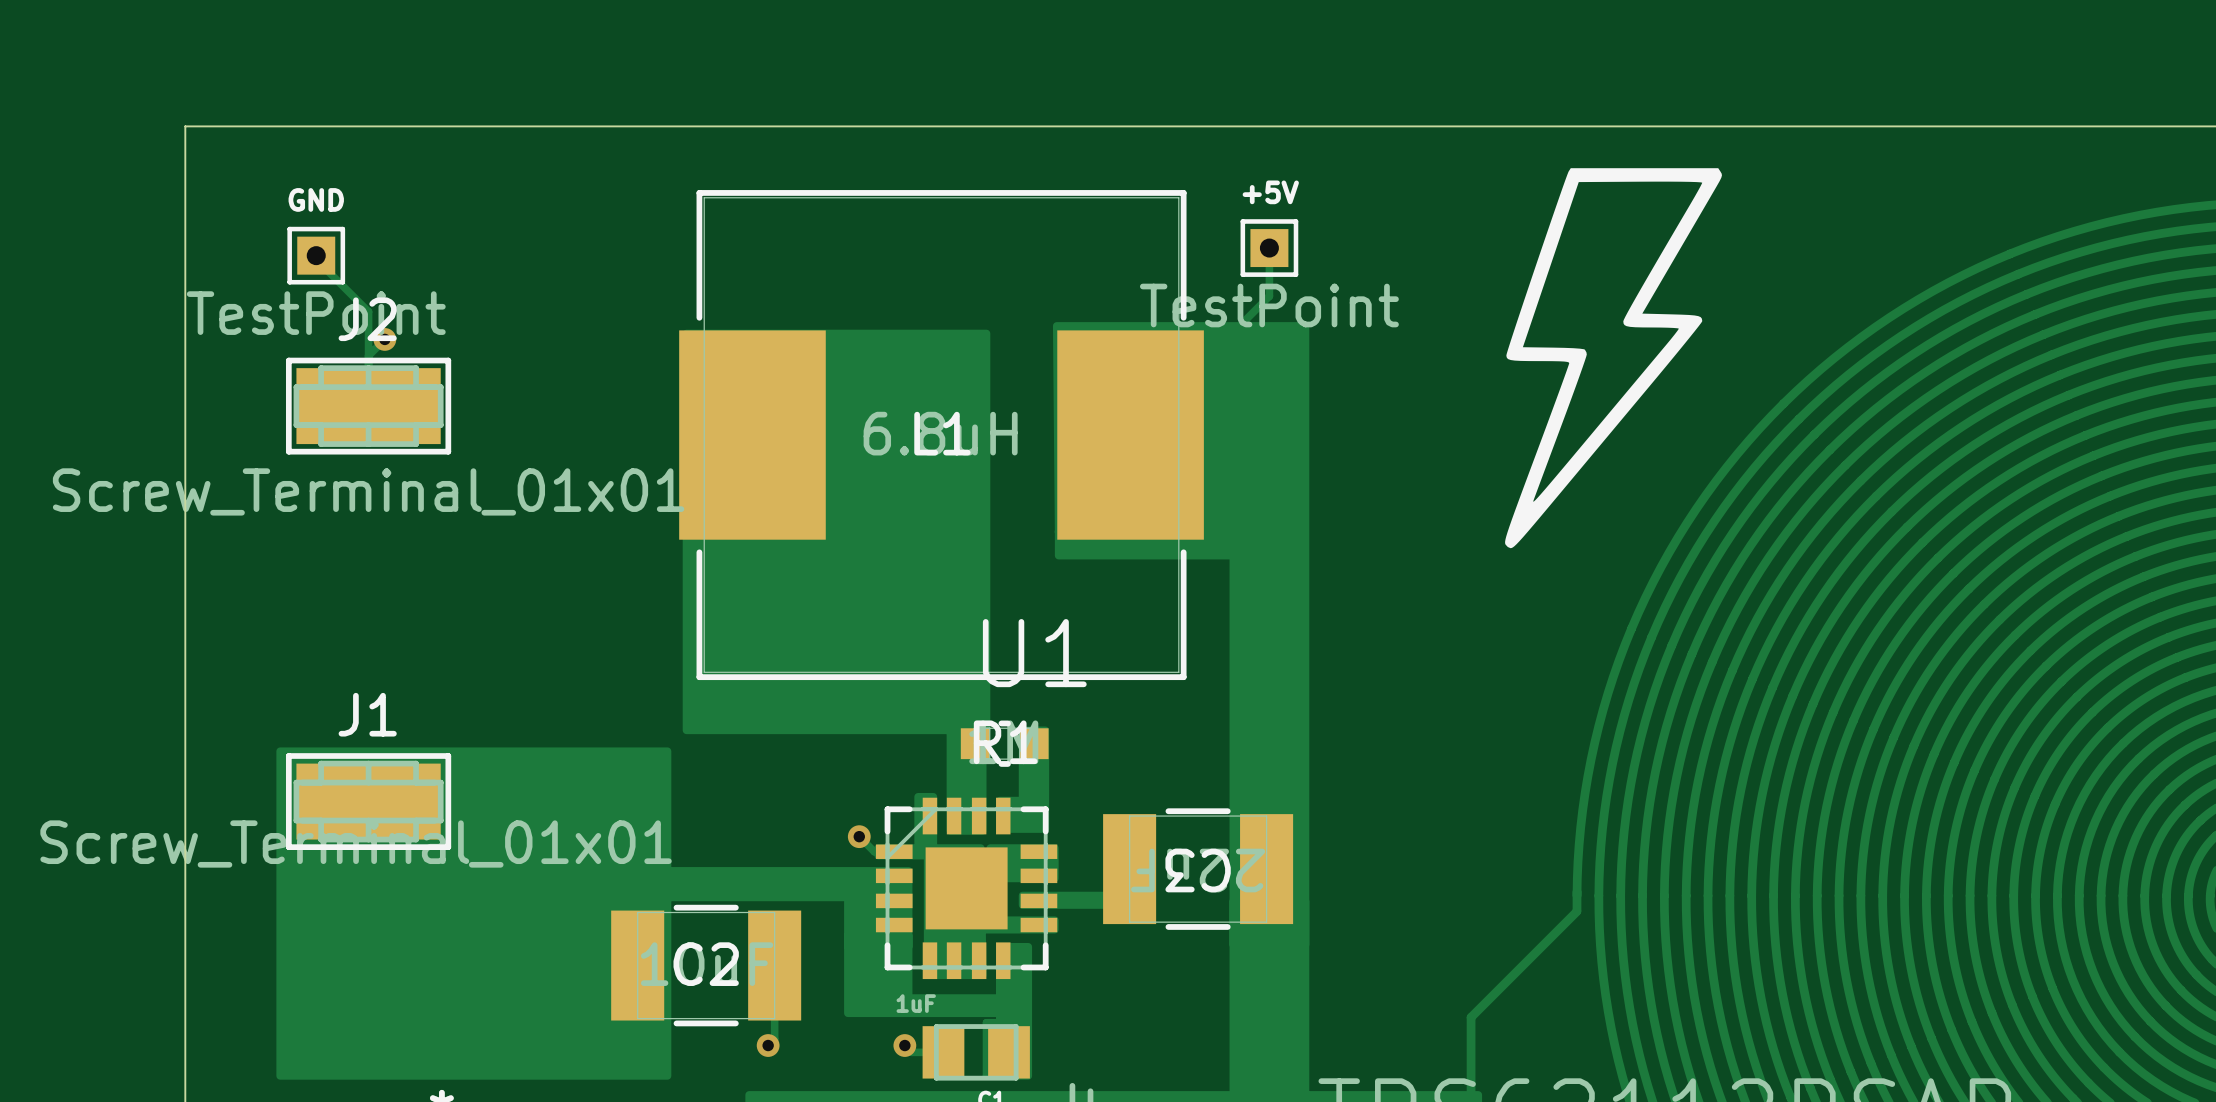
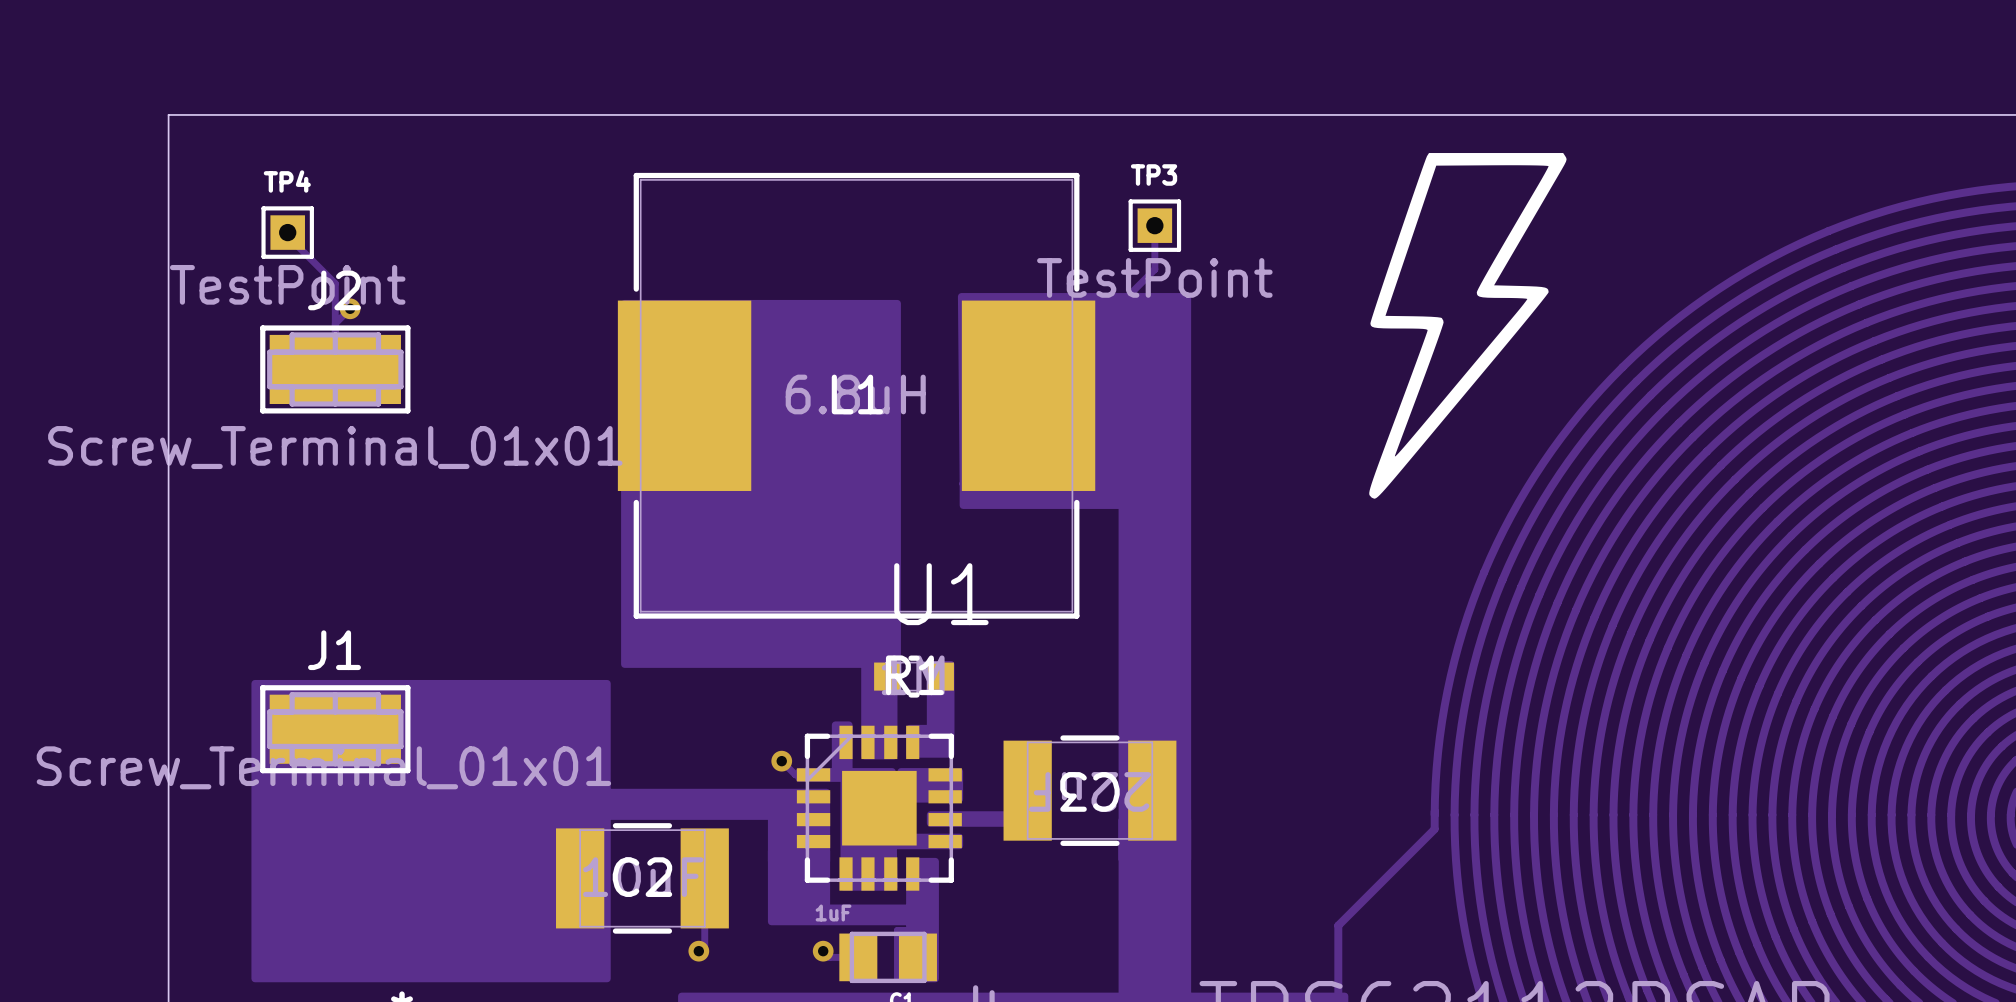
+5V name: +5V (1270, 192) -> TP3 (1154, 174)
GND name: GND (316, 199) -> TP4 (287, 181)

